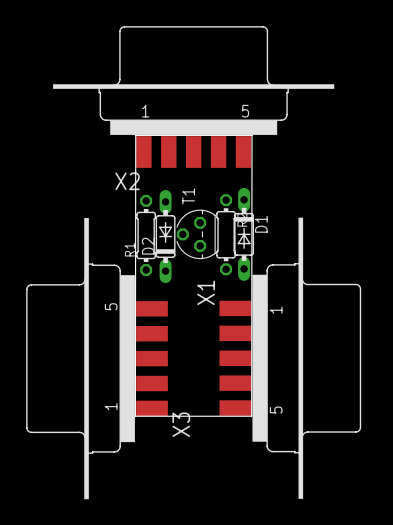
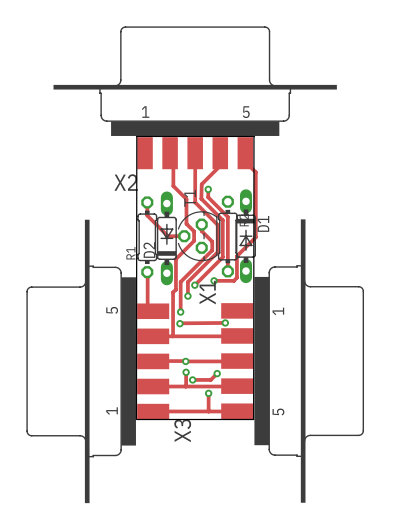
track: none -> (173, 153) (173, 186) (186, 199) (186, 223) (194, 231) (194, 240) (175, 259) (172, 336)
track: none -> (198, 153) (195, 156) (195, 202) (217, 224) (217, 252) (187, 281) (187, 296)
track: none -> (223, 153) (220, 165) (201, 184) (201, 198) (222, 220) (222, 257) (194, 285)
track: none -> (248, 153) (248, 165) (255, 172) (255, 237) (236, 256) (236, 277) (234, 280) (214, 280)
track: none -> (208, 189) (208, 197) (227, 216) (227, 271)
via: none -> (208, 189)
track: none -> (147, 202) (147, 215) (167, 236) (184, 236)
track: none -> (201, 224) (201, 231) (212, 241) (212, 250) (180, 281) (180, 312)
track: none -> (147, 272) (147, 309) (153, 310)
via: none -> (214, 280)
via: none -> (194, 285)
via: none -> (187, 296)
via: none -> (180, 312)
track: none -> (225, 322) (179, 323)
via: none -> (225, 322)
via: none -> (179, 323)
track: none -> (153, 335) (243, 335)
track: none -> (153, 361) (243, 361)
via: none -> (185, 361)
track: none -> (186, 372) (185, 386)
via: none -> (186, 372)
track: none -> (217, 373) (210, 379) (192, 379)
via: none -> (217, 373)
via: none -> (192, 379)
track: none -> (153, 386) (243, 386)
track: none -> (208, 393) (208, 411)
via: none -> (208, 393)
track: none -> (153, 411) (236, 411)

